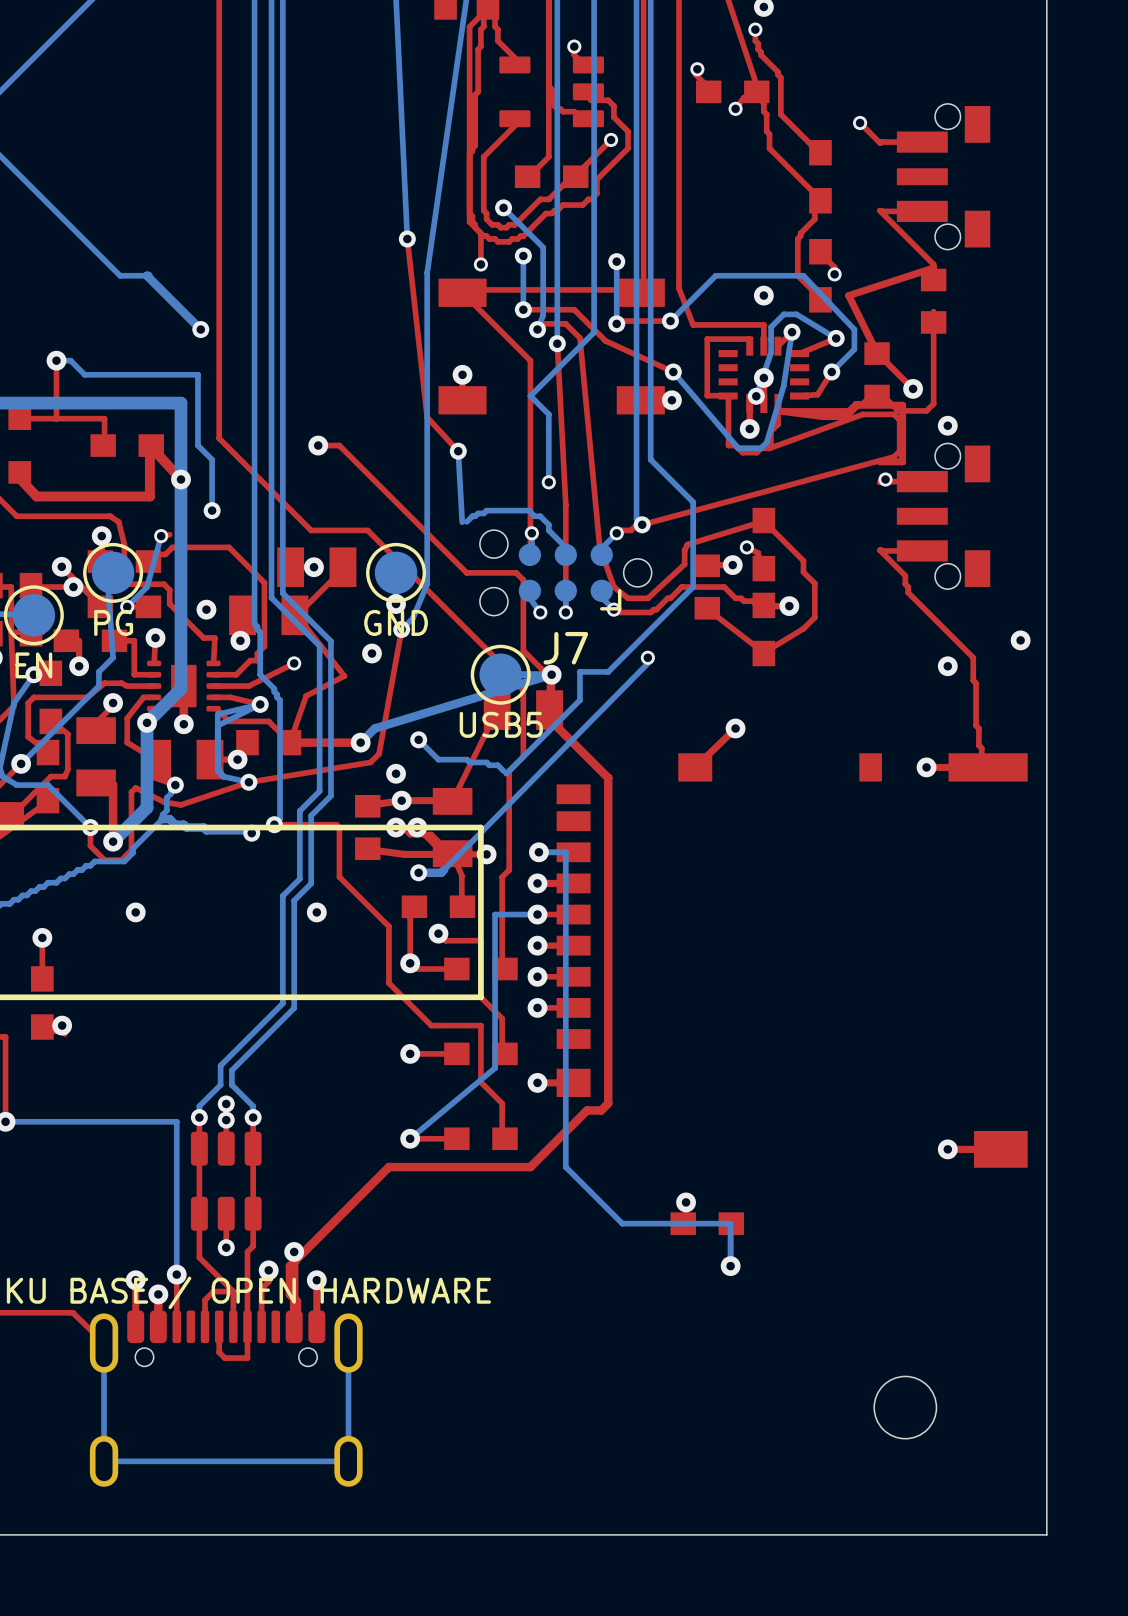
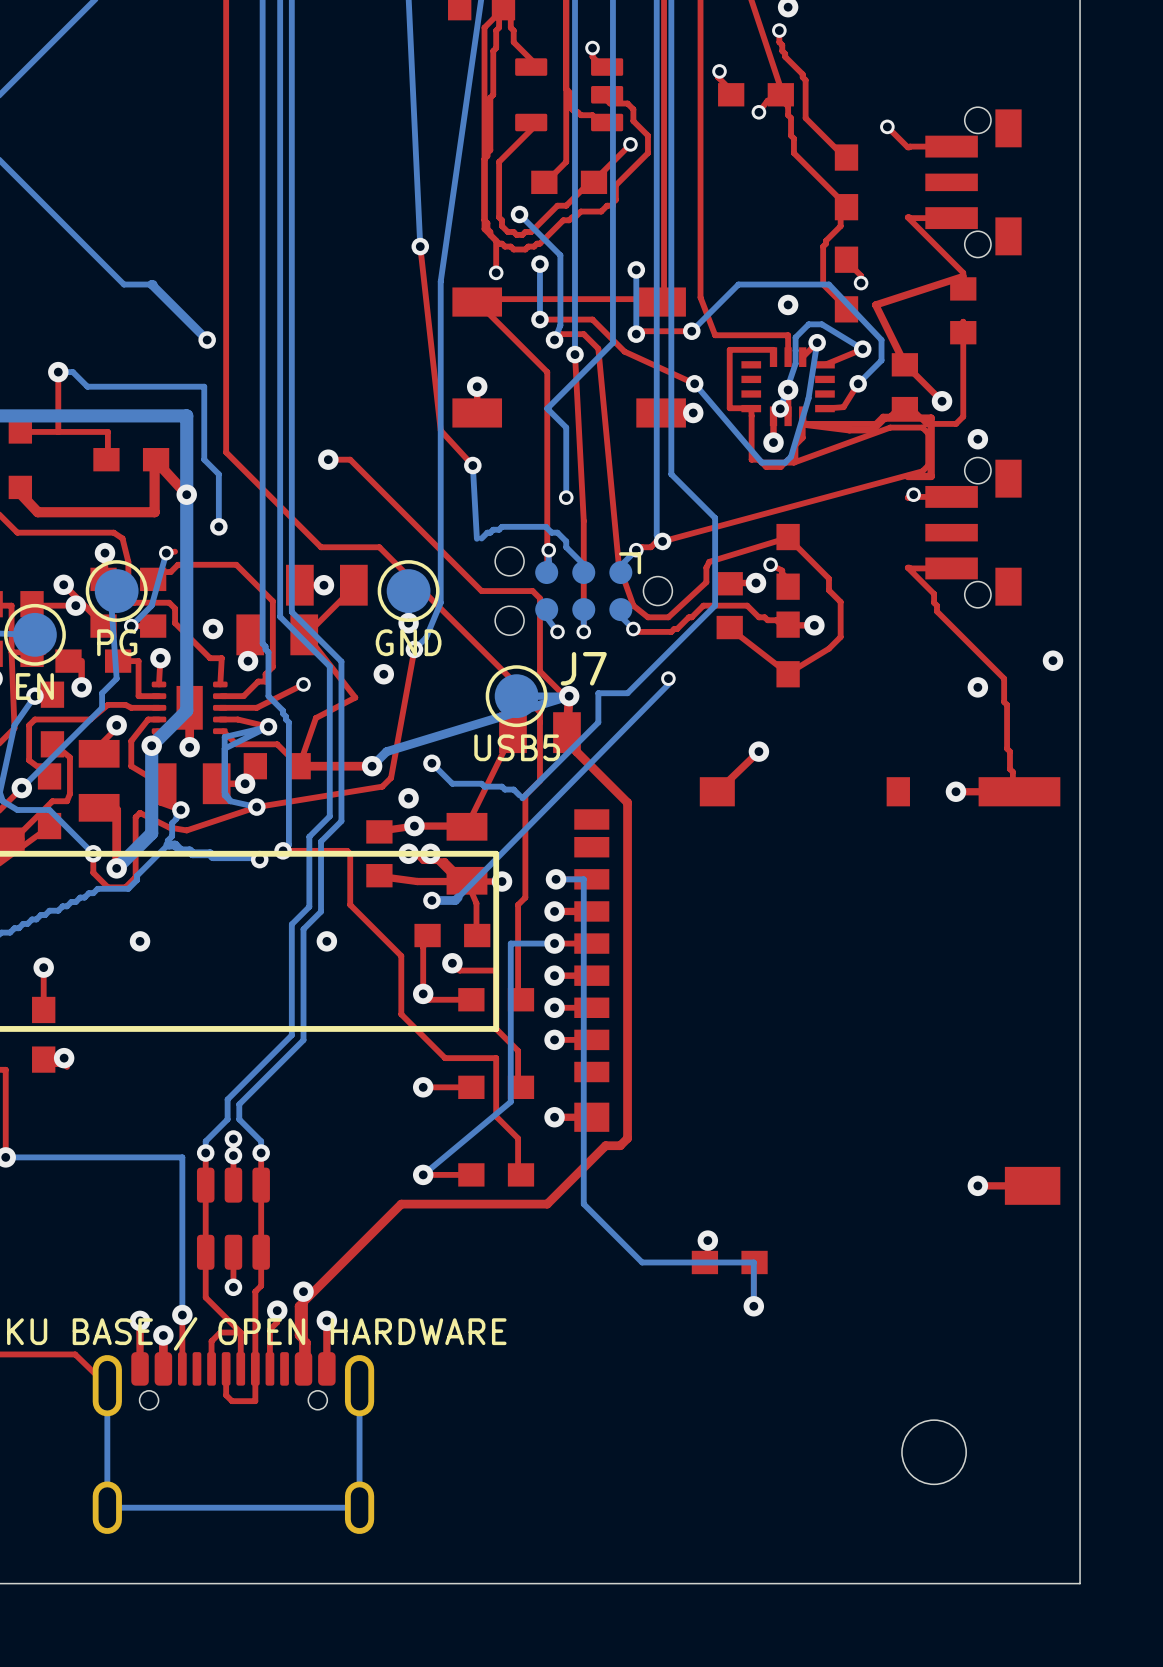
J7 footprint: [479, 530, 652, 616] -> [495, 546, 673, 636]

